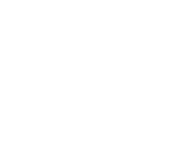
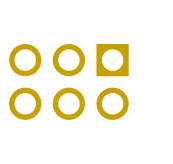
part: none -> (68, 81)

